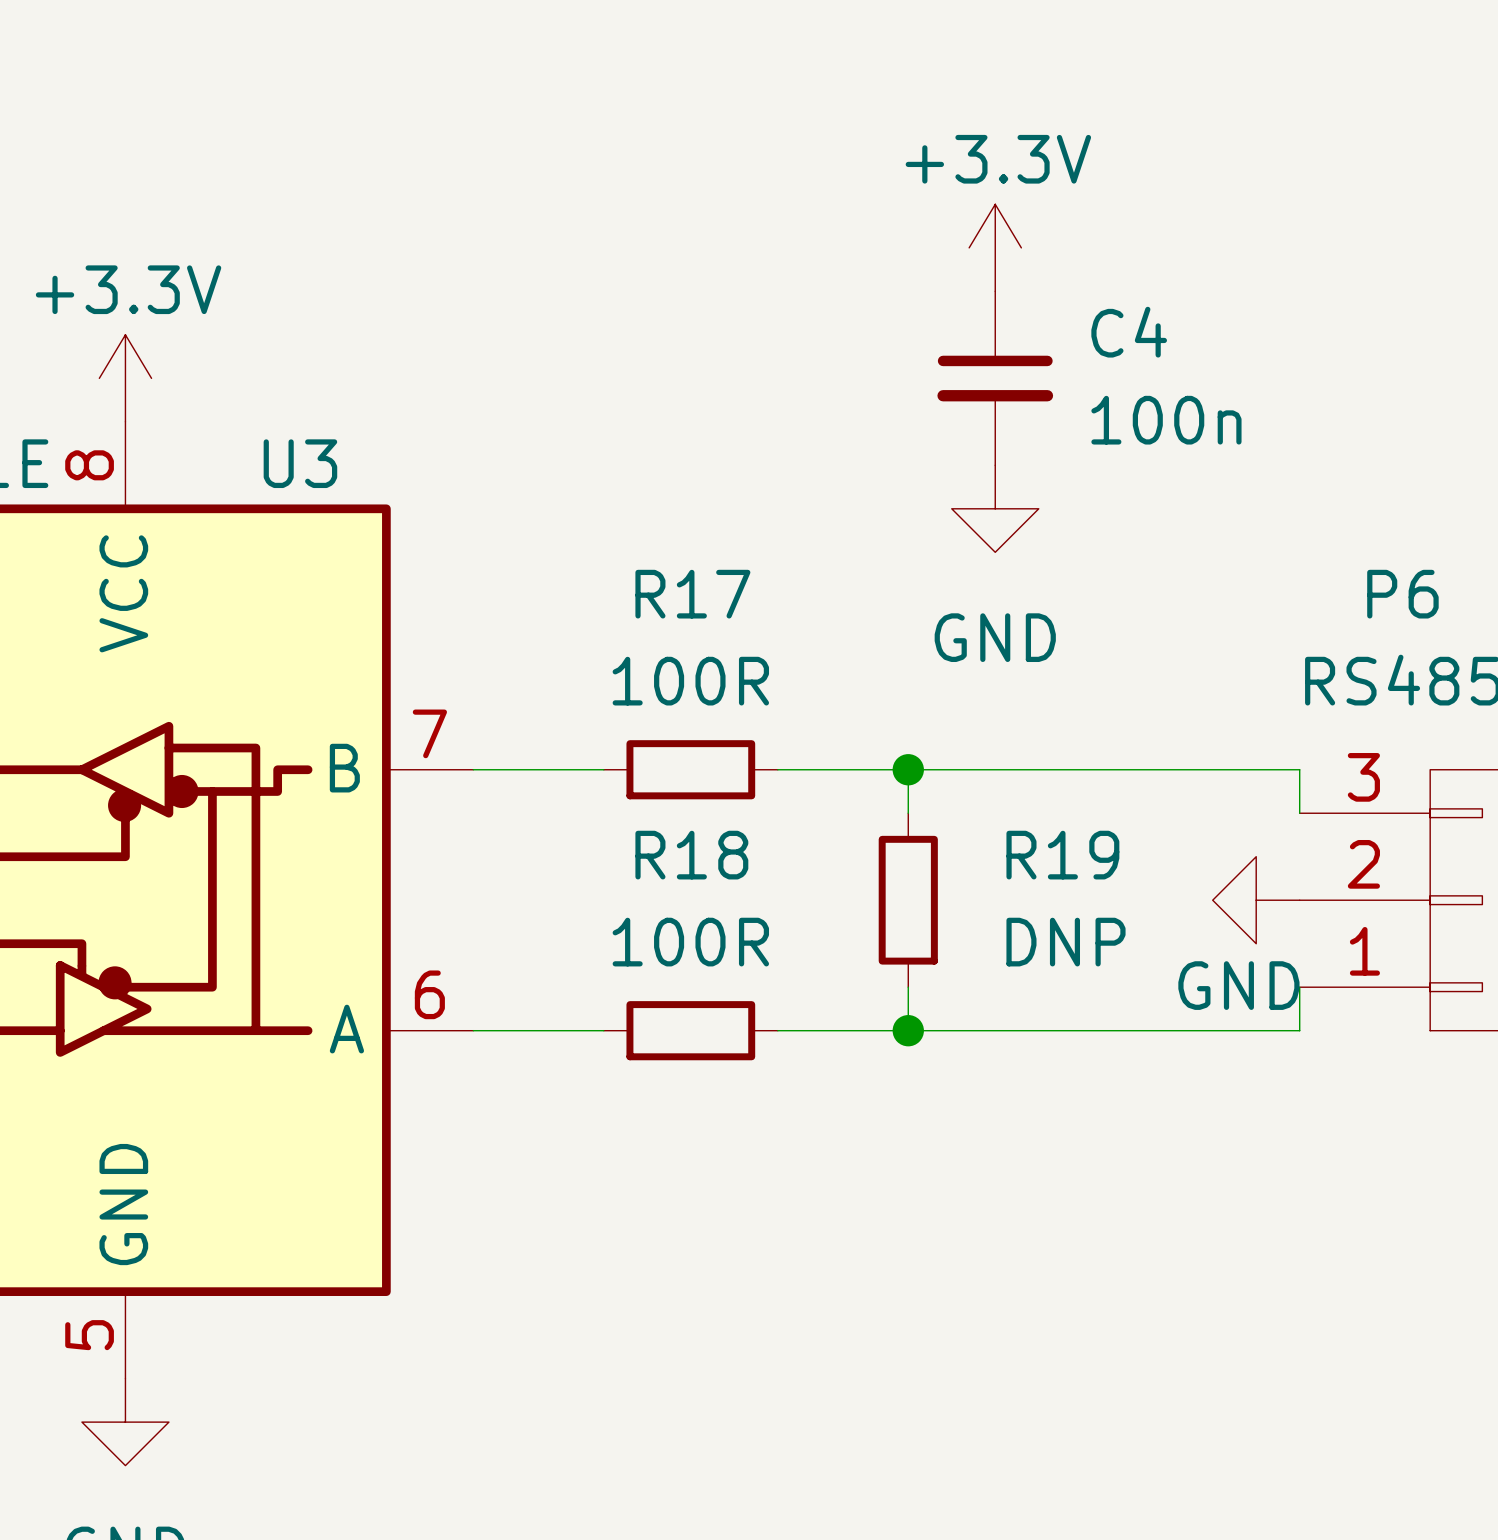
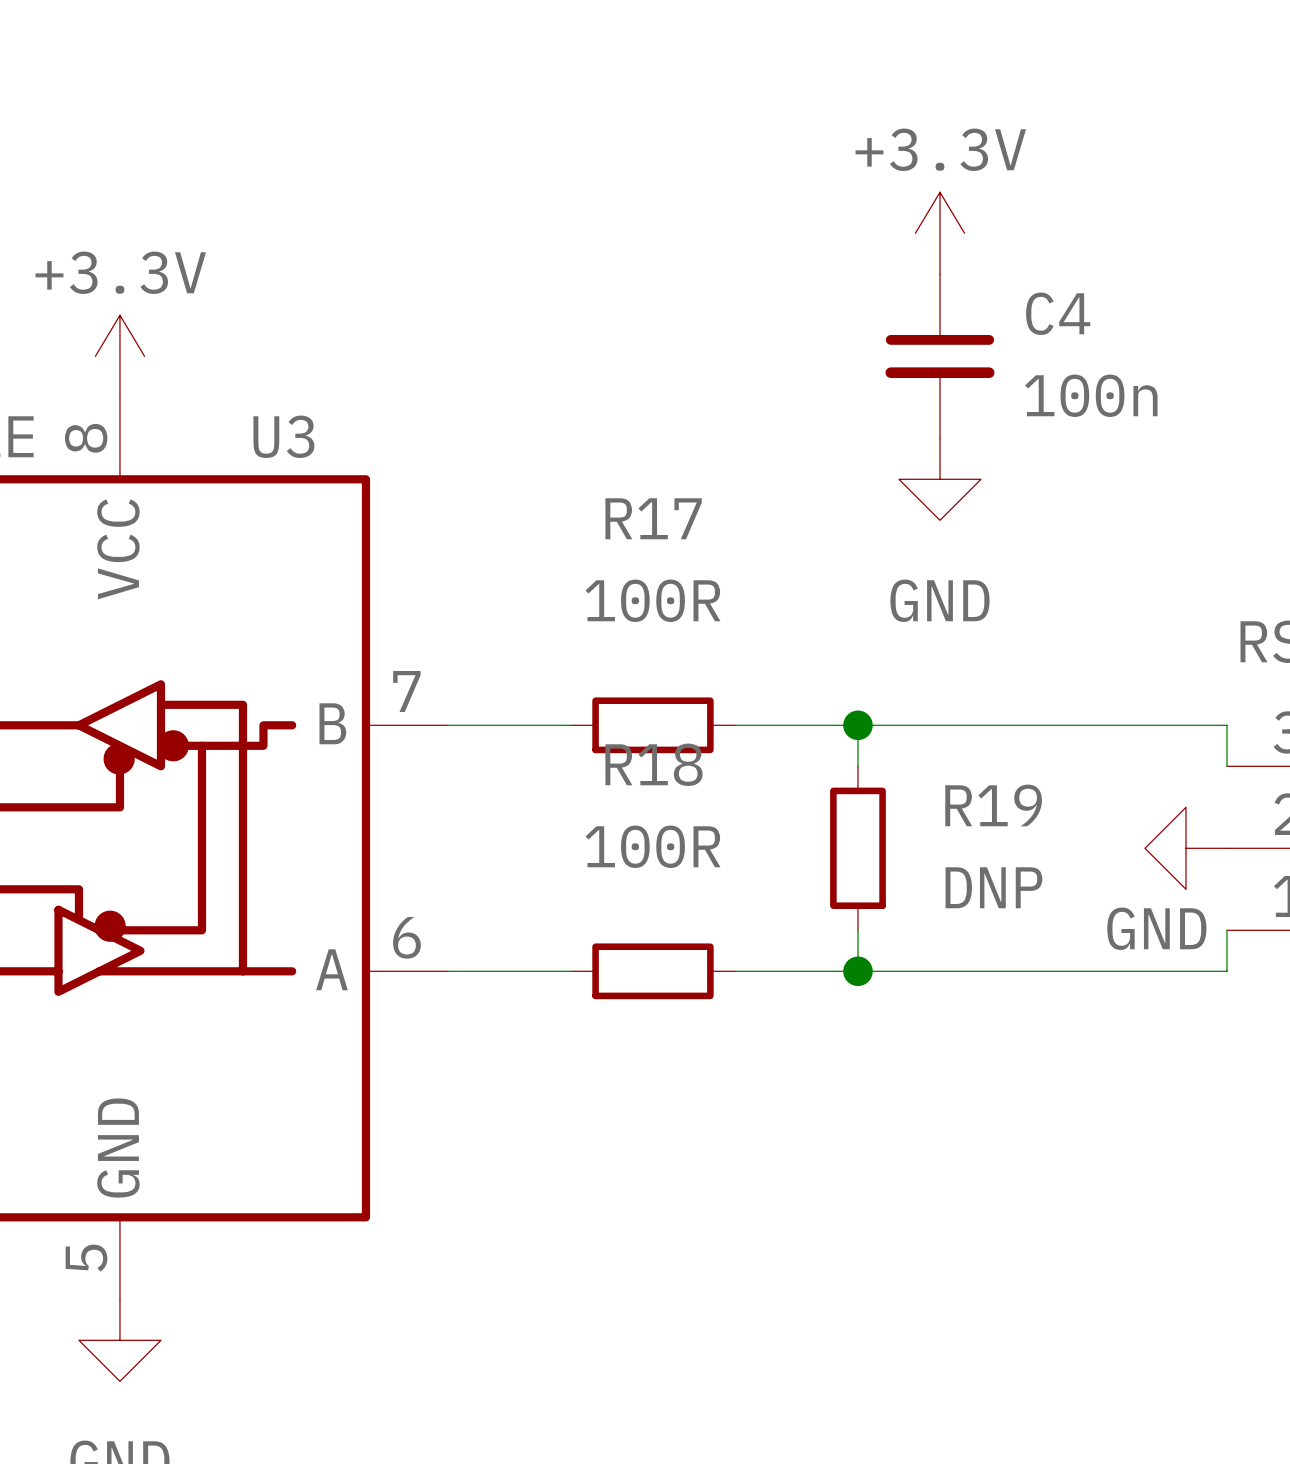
R17 name position: R17 (692, 594) -> R17 (653, 518)
R17 value position: 100R (690, 681) -> 100R (653, 600)
R18 name position: R18 (691, 855) -> R18 (654, 764)
R18 value position: 100R (690, 942) -> 100R (653, 846)

